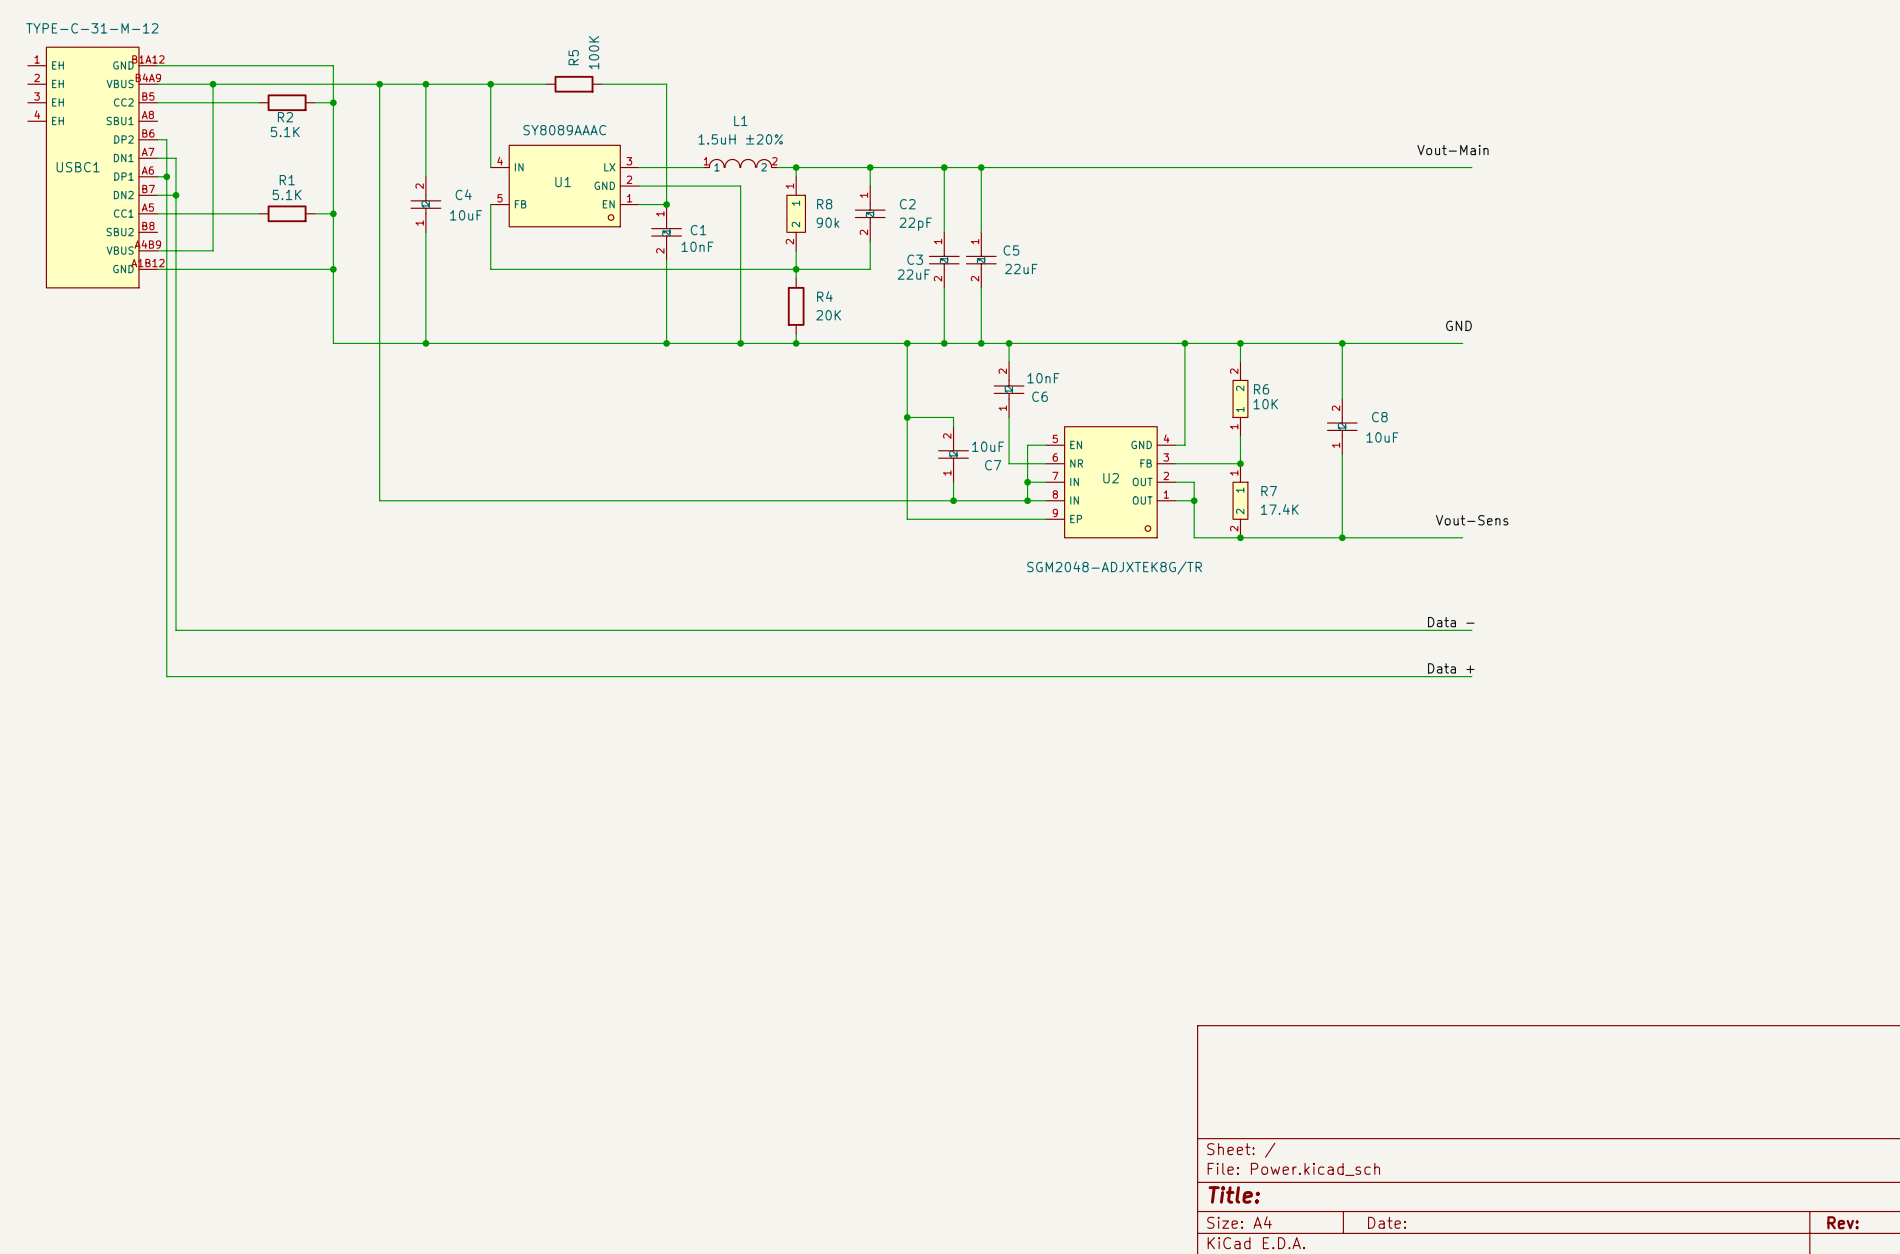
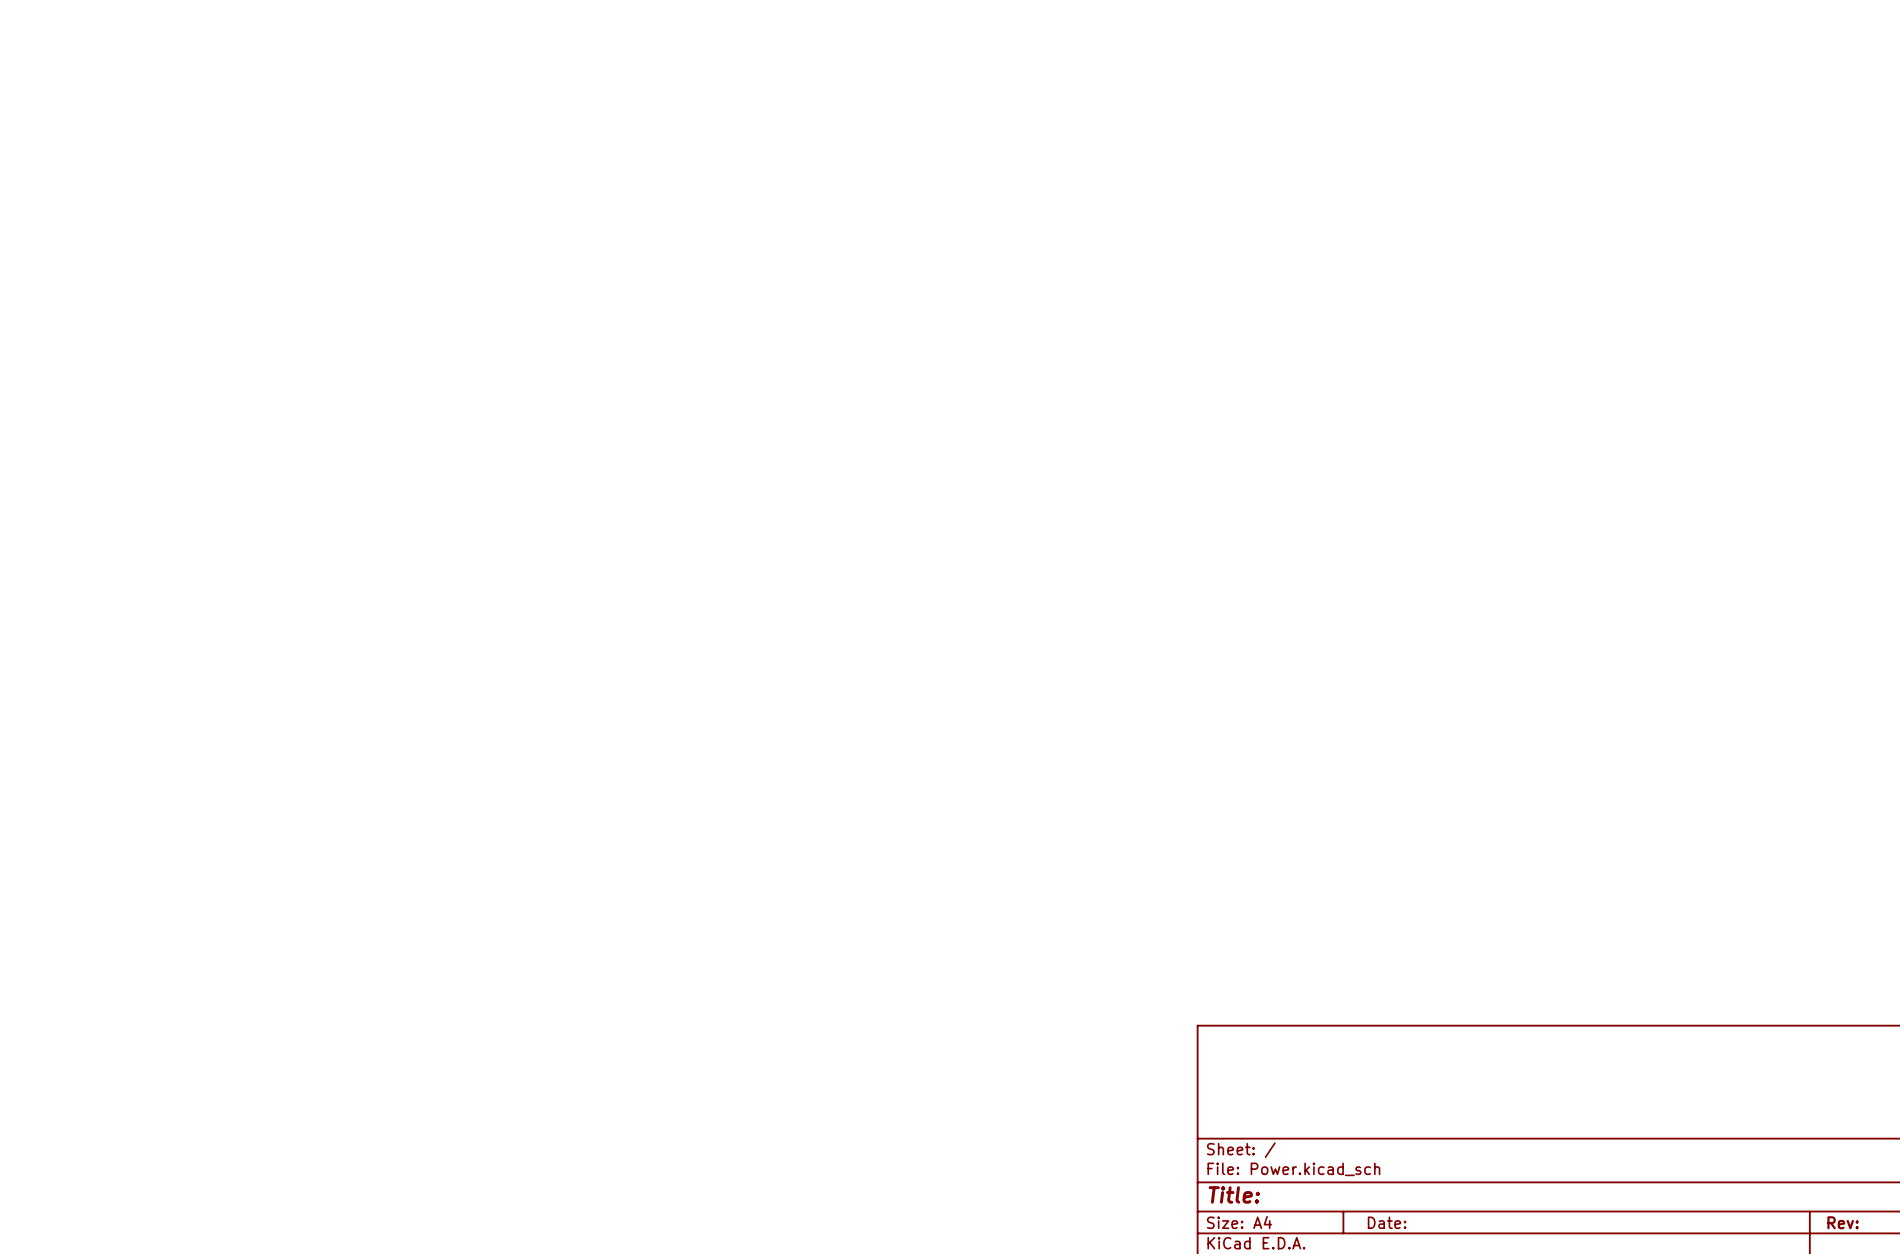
wire: (157, 65) (333, 65) (333, 343) (1462, 343) -> none
wire: (157, 84) (546, 84) -> none
wire: (213, 84) (213, 250) (157, 250) -> none
junction: (213, 84) -> none
wire: (379, 84) (379, 500) (1046, 500) -> none
junction: (379, 84) -> none
wire: (425, 84) (425, 176) -> none
junction: (425, 84) -> none
wire: (490, 84) (490, 167) -> none
junction: (490, 84) -> none
R5: 100K (574, 84) -> none
wire: (601, 84) (666, 84) (666, 204) (638, 204) -> none
wire: (157, 102) (259, 102) -> none
R2: 5.1K (287, 102) -> none
wire: (314, 102) (333, 102) -> none
junction: (333, 102) -> none
wire: (157, 139) (166, 139) (166, 676) (1471, 676) -> none
label: Vout-Main (1452, 150) -> none
wire: (157, 158) (176, 158) (176, 630) (1471, 630) -> none
L1: 1.5uH ±20% (740, 163) -> none
USBC1: TYPE-C-31-M-12 (92, 167) -> none
wire: (638, 167) (703, 167) -> none
wire: (777, 167) (1471, 167) -> none
wire: (796, 167) (796, 176) -> none
junction: (796, 167) -> none
wire: (870, 167) (870, 186) -> none
junction: (870, 167) -> none
wire: (944, 167) (944, 232) -> none
junction: (944, 167) -> none
wire: (981, 167) (981, 232) -> none
junction: (981, 167) -> none
wire: (157, 176) (166, 176) -> none
junction: (166, 176) -> none
U1: SY8089AAAC (564, 186) -> none
wire: (638, 186) (740, 186) (740, 343) -> none
wire: (157, 195) (176, 195) -> none
junction: (176, 195) -> none
C4: 10uF (425, 204) -> none
wire: (490, 204) (490, 269) (870, 269) (870, 241) -> none
junction: (666, 204) -> none
wire: (157, 213) (259, 213) -> none
R1: 5.1K (287, 213) -> none
wire: (314, 213) (333, 213) -> none
junction: (333, 213) -> none
R8: 90k (796, 213) -> none
C2: 22pF (870, 213) -> none
wire: (425, 232) (425, 343) -> none
C1: 10nF (666, 232) -> none
wire: (796, 250) (796, 278) -> none
wire: (666, 260) (666, 343) -> none
C3: 22uF (944, 260) -> none
C5: 22uF (981, 260) -> none
wire: (157, 269) (333, 269) -> none
junction: (333, 269) -> none
junction: (796, 269) -> none
wire: (944, 287) (944, 343) -> none
wire: (981, 287) (981, 343) -> none
R4: 20K (796, 306) -> none
label: GND (1458, 325) -> none
wire: (796, 334) (796, 343) -> none
junction: (425, 343) -> none
junction: (666, 343) -> none
junction: (740, 343) -> none
junction: (796, 343) -> none
wire: (907, 343) (907, 519) (1046, 519) -> none
junction: (907, 343) -> none
junction: (944, 343) -> none
junction: (981, 343) -> none
wire: (1009, 343) (1009, 361) -> none
junction: (1009, 343) -> none
wire: (1184, 343) (1184, 445) (1175, 445) -> none
junction: (1184, 343) -> none
wire: (1240, 343) (1240, 361) -> none
junction: (1240, 343) -> none
wire: (1342, 343) (1342, 398) -> none
junction: (1342, 343) -> none
C6: 10nF (1009, 389) -> none
R6: 10K (1240, 398) -> none
wire: (907, 417) (953, 417) (953, 426) -> none
junction: (907, 417) -> none
wire: (1009, 417) (1009, 463) (1046, 463) -> none
C8: 10uF (1342, 426) -> none
wire: (1240, 435) (1240, 463) (1175, 463) -> none
wire: (1046, 445) (1027, 445) (1027, 500) -> none
C7: 10uF (953, 454) -> none
wire: (1342, 454) (1342, 537) -> none
junction: (1240, 463) -> none
wire: (953, 482) (953, 500) -> none
wire: (1027, 482) (1046, 482) -> none
junction: (1027, 482) -> none
U2: SGM2048-ADJXTEK8G/TR (1110, 482) -> none
wire: (1175, 482) (1194, 482) (1194, 537) (1462, 537) -> none
junction: (953, 500) -> none
junction: (1027, 500) -> none
wire: (1175, 500) (1194, 500) -> none
junction: (1194, 500) -> none
R7: 17.4K (1240, 500) -> none
label: Vout-Sens (1472, 520) -> none
junction: (1240, 537) -> none
junction: (1342, 537) -> none
label: Data - (1451, 622) -> none
label: Data + (1451, 668) -> none

